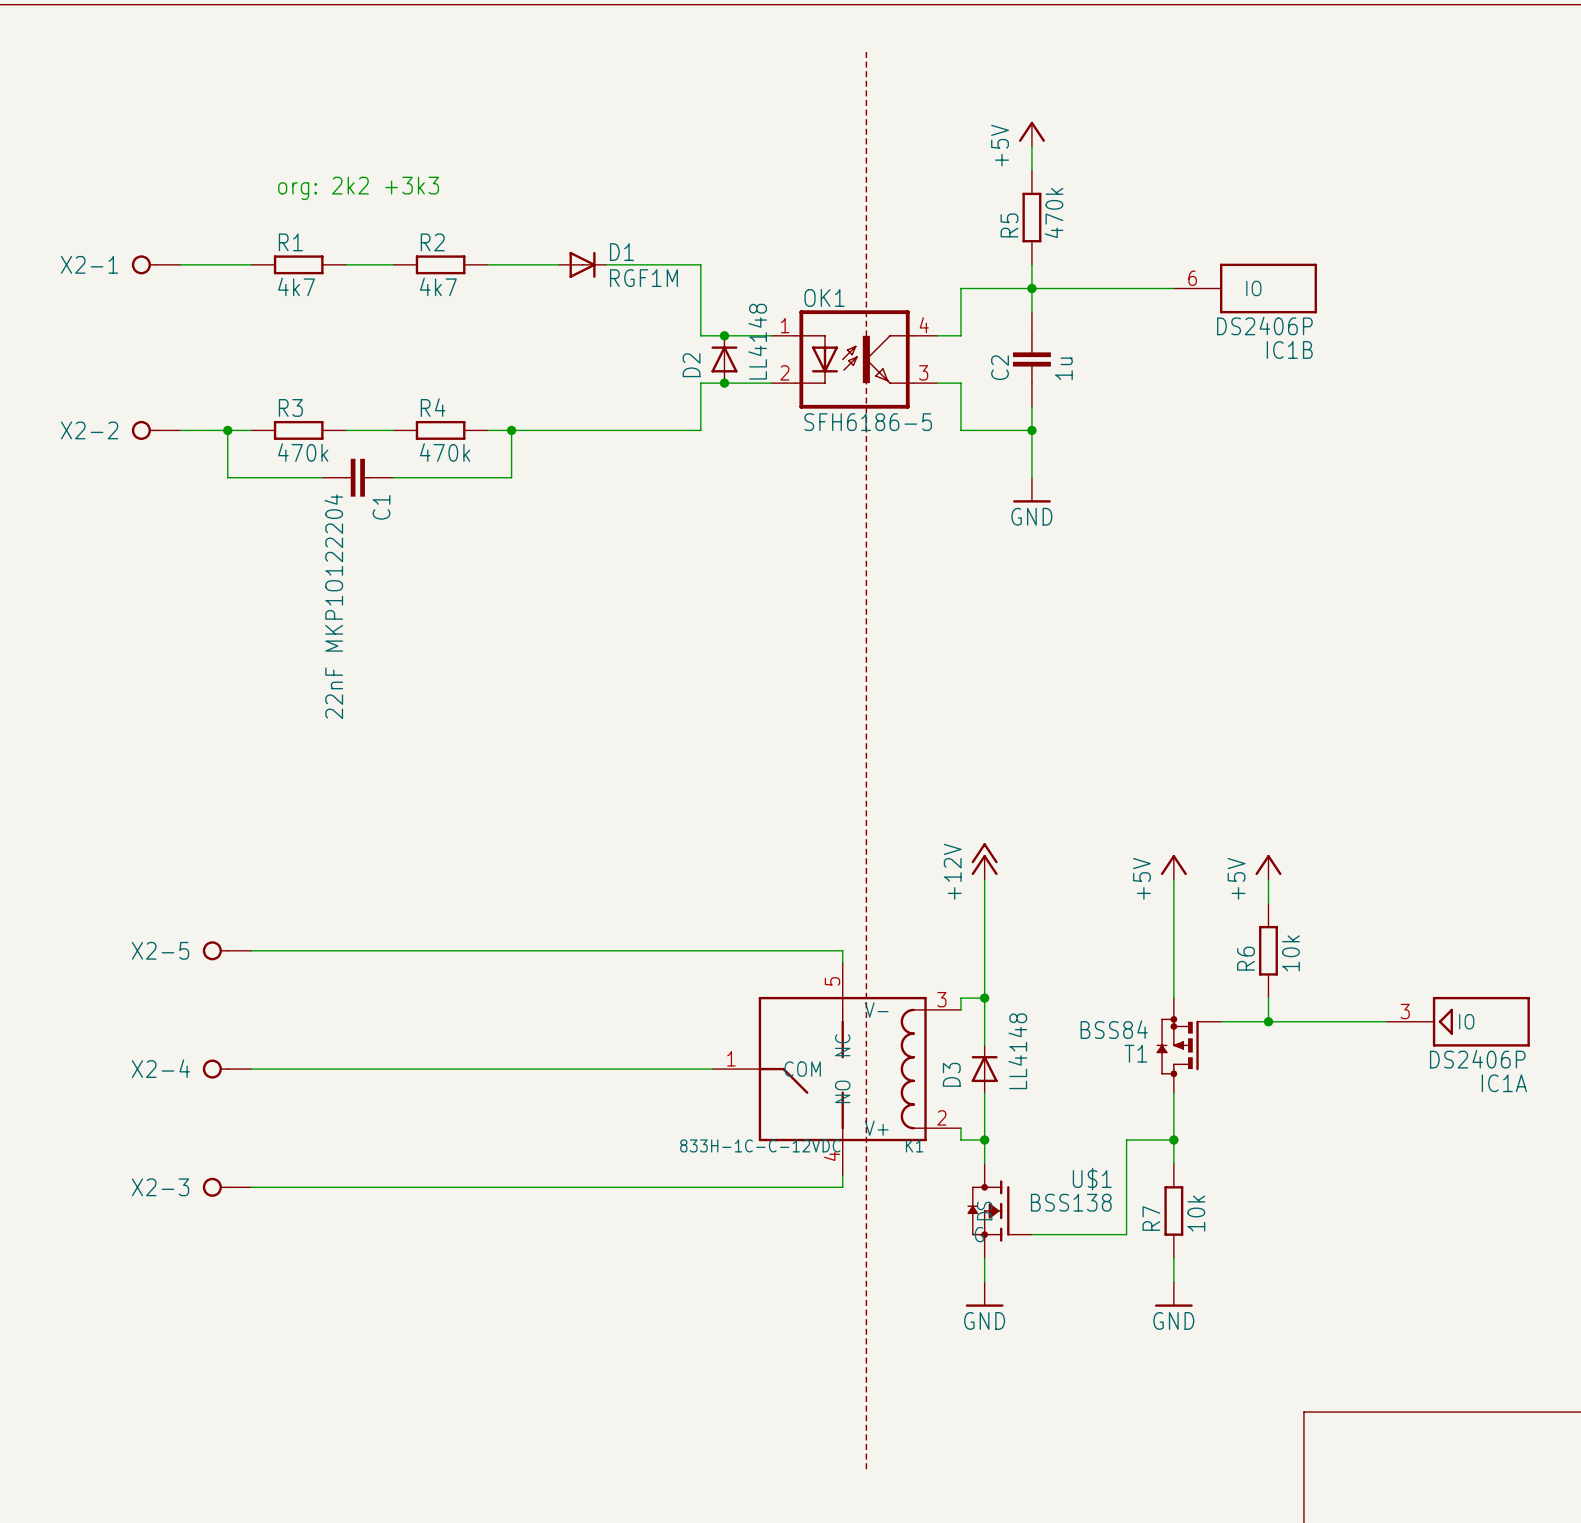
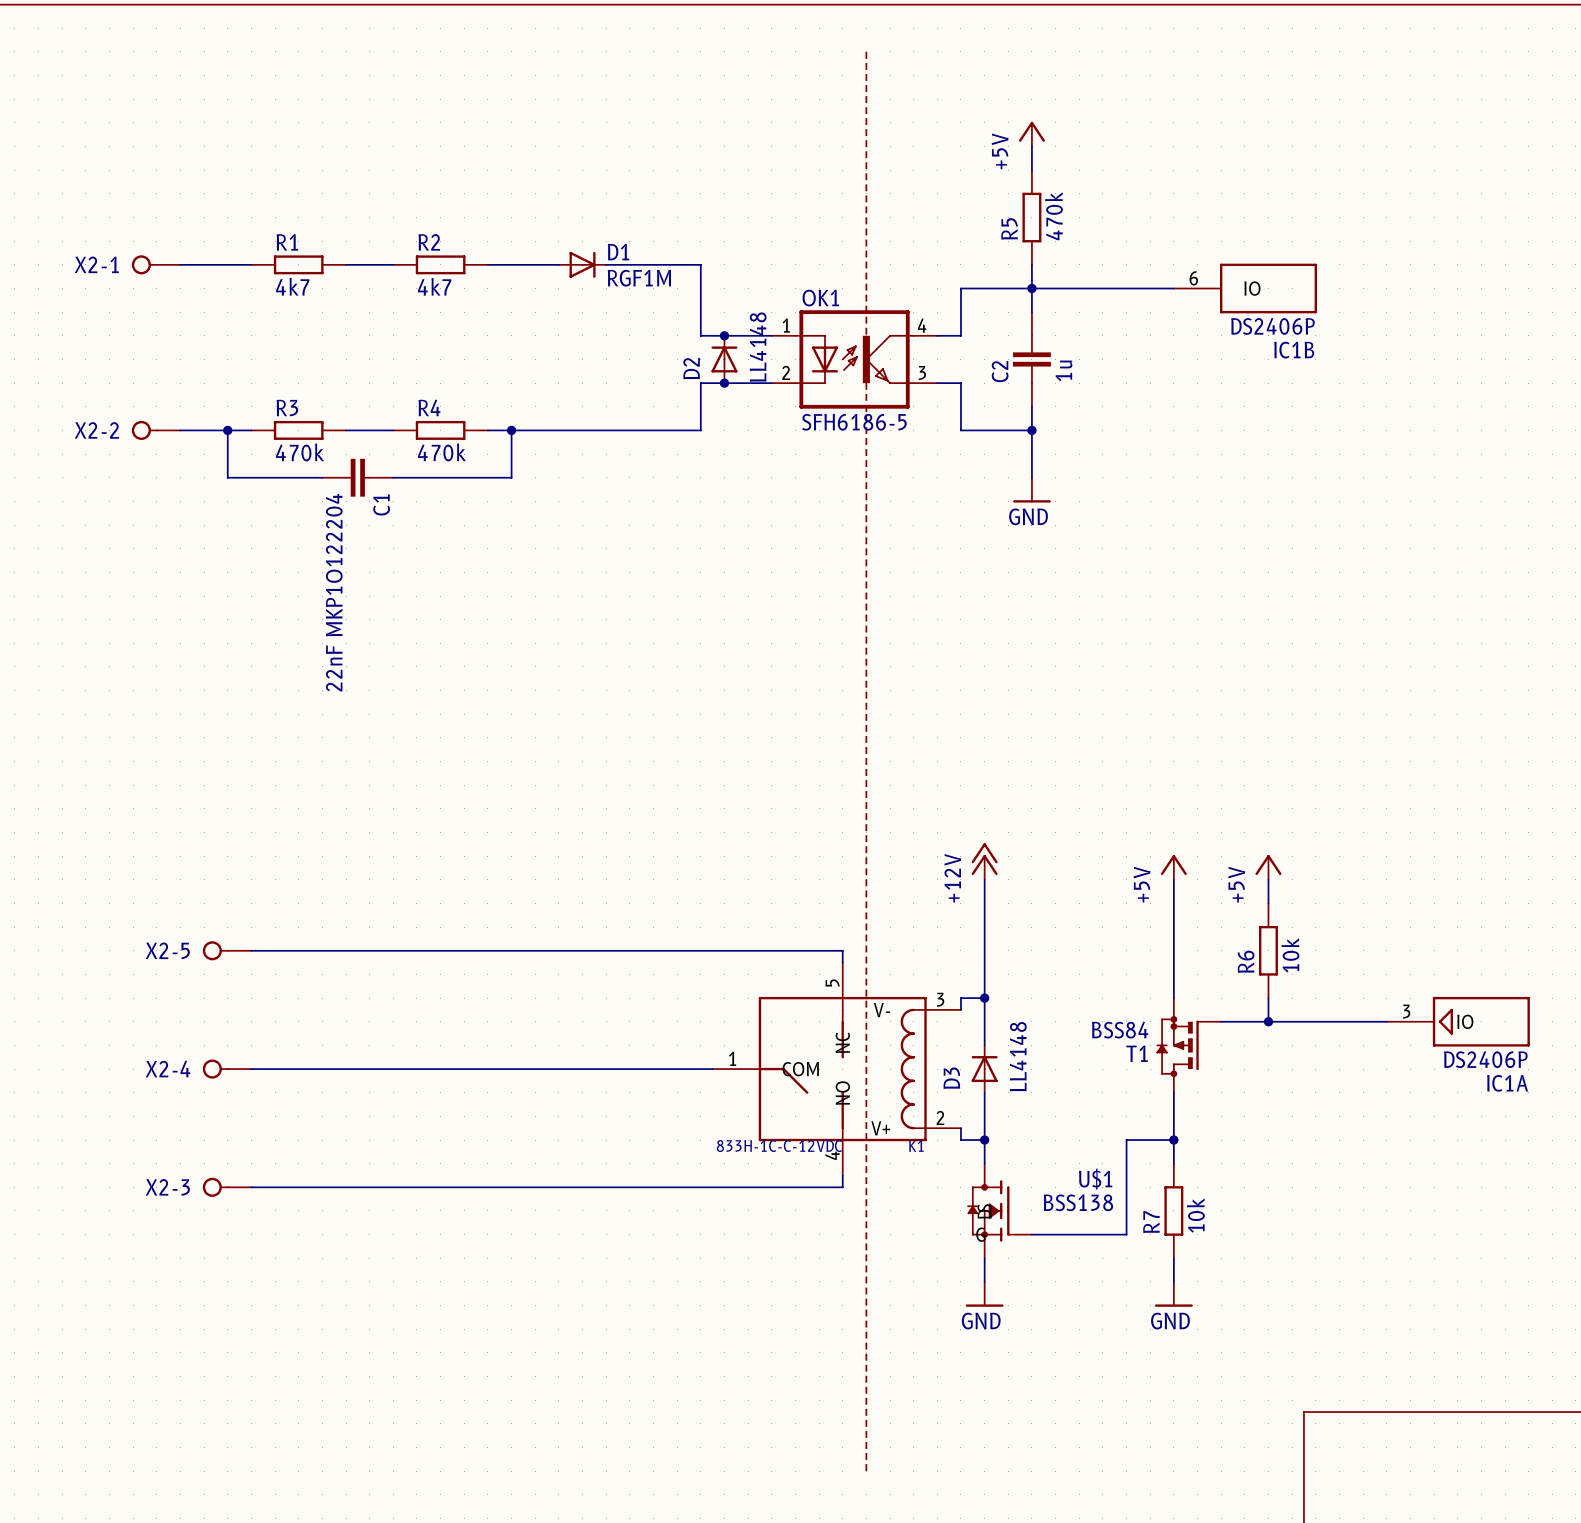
text: org: 2k2 +3k3 (358, 188) -> none

